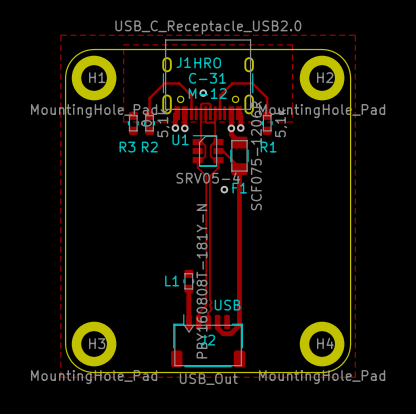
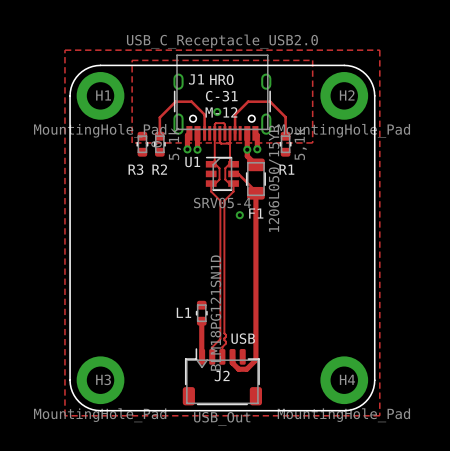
F1 value: SCF075-1206R (256, 155) -> 1206L050/15YR (274, 178)
L1 value: PBY160808T-181Y-N (202, 281) -> BLM18PG121SN1D (215, 313)

